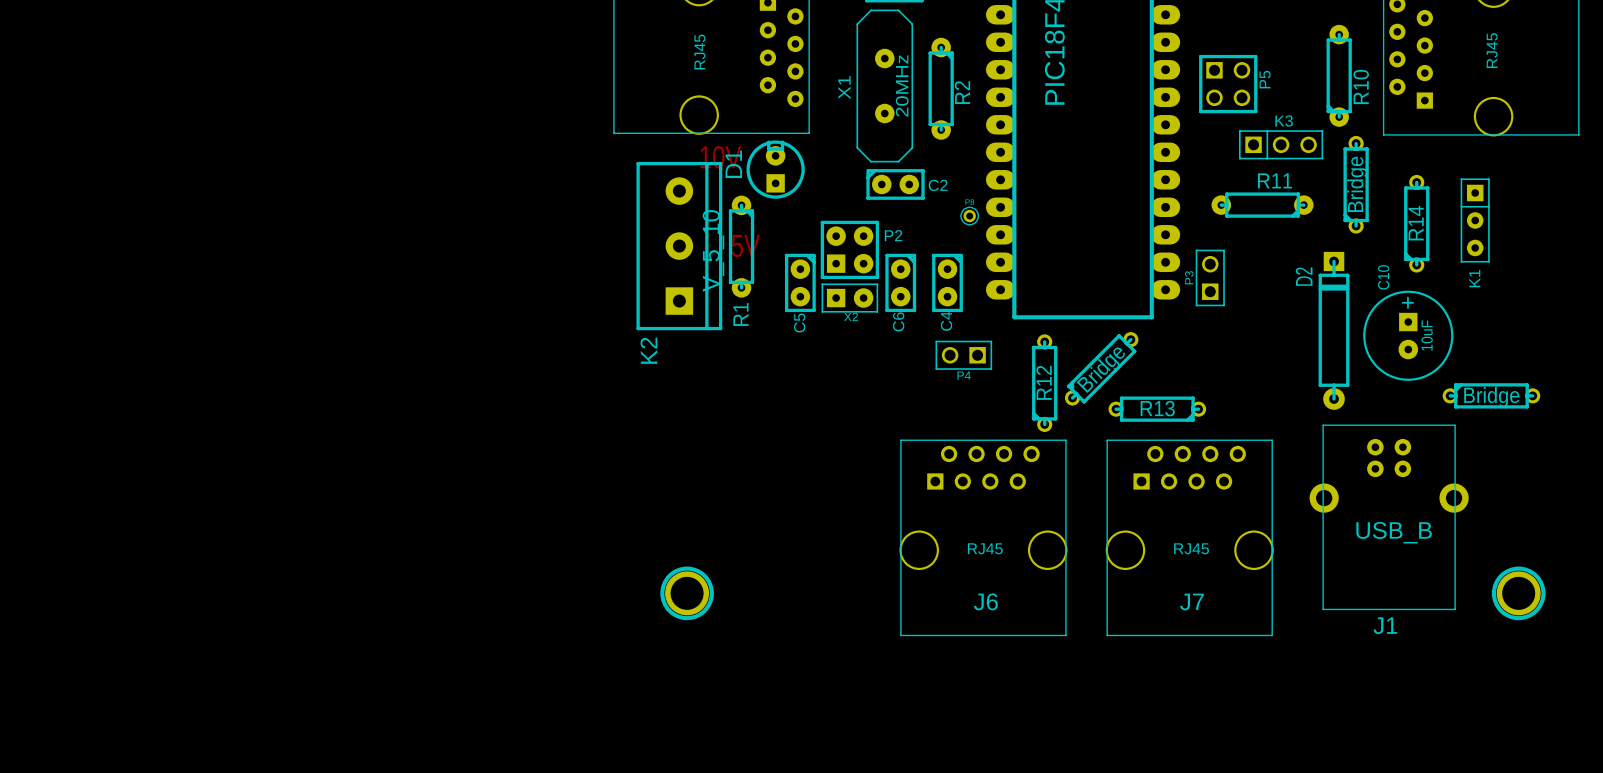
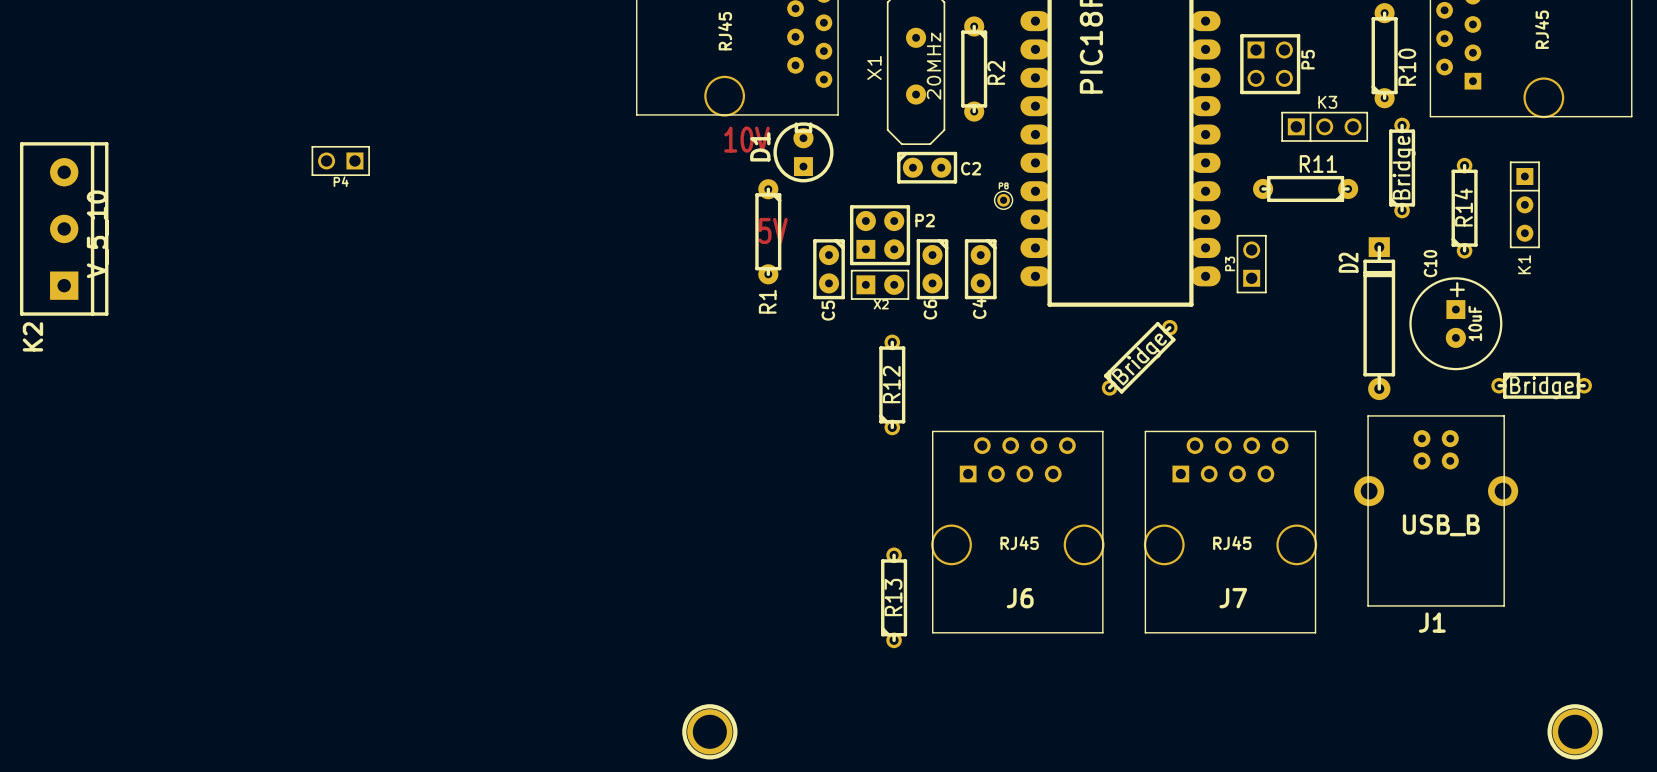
K2 position: (679, 246) -> (64, 228)
P4 position: (963, 355) -> (340, 160)
R12 position: (1044, 383) -> (892, 384)
R13 rotation: 0° (1157, 409) -> 90° clockwise (894, 597)
R13 position: (1157, 409) -> (894, 597)
part position: (687, 593) -> (709, 731)
part position: (1518, 593) -> (1575, 731)

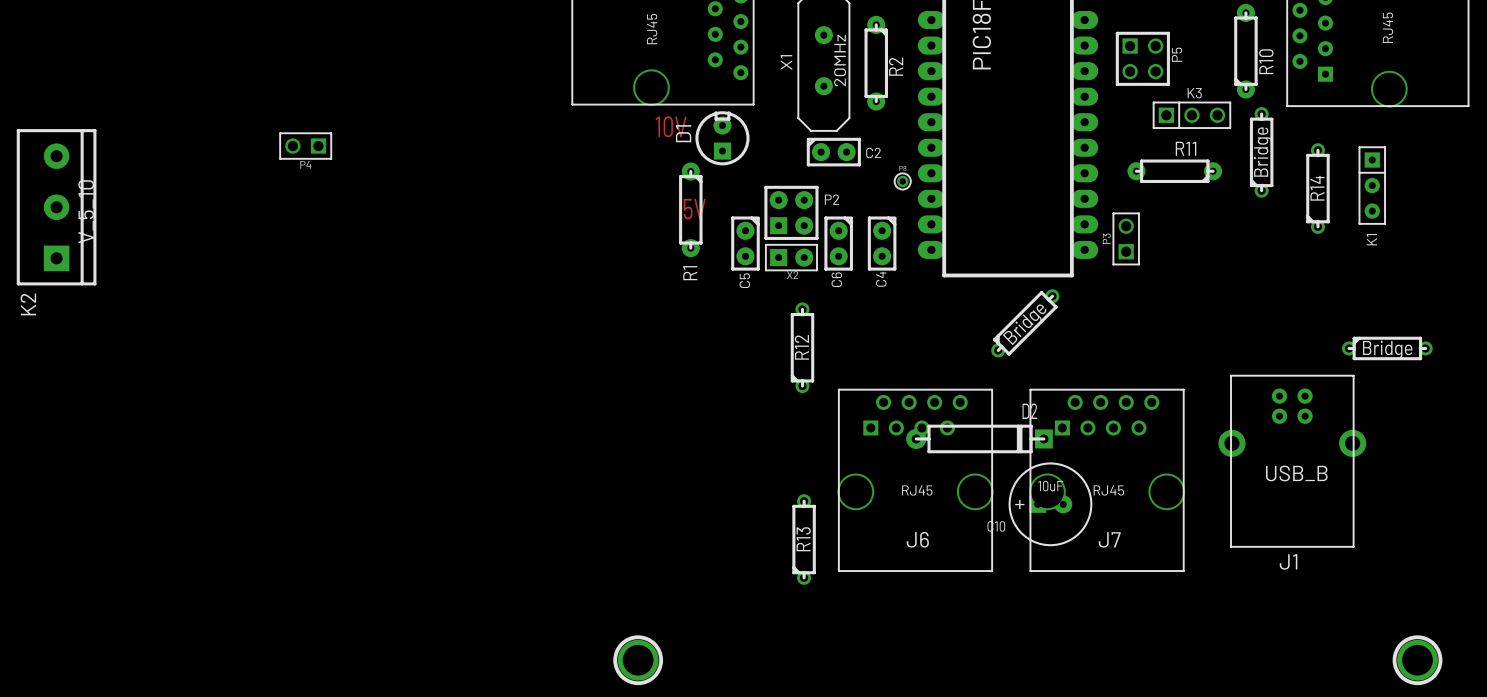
D2 rotation: 0° (1379, 318) -> 90° clockwise (979, 438)
D2 position: (1379, 318) -> (979, 438)
C10 rotation: 0° (1455, 323) -> 90° counterclockwise (1050, 504)
C10 position: (1455, 323) -> (1050, 504)

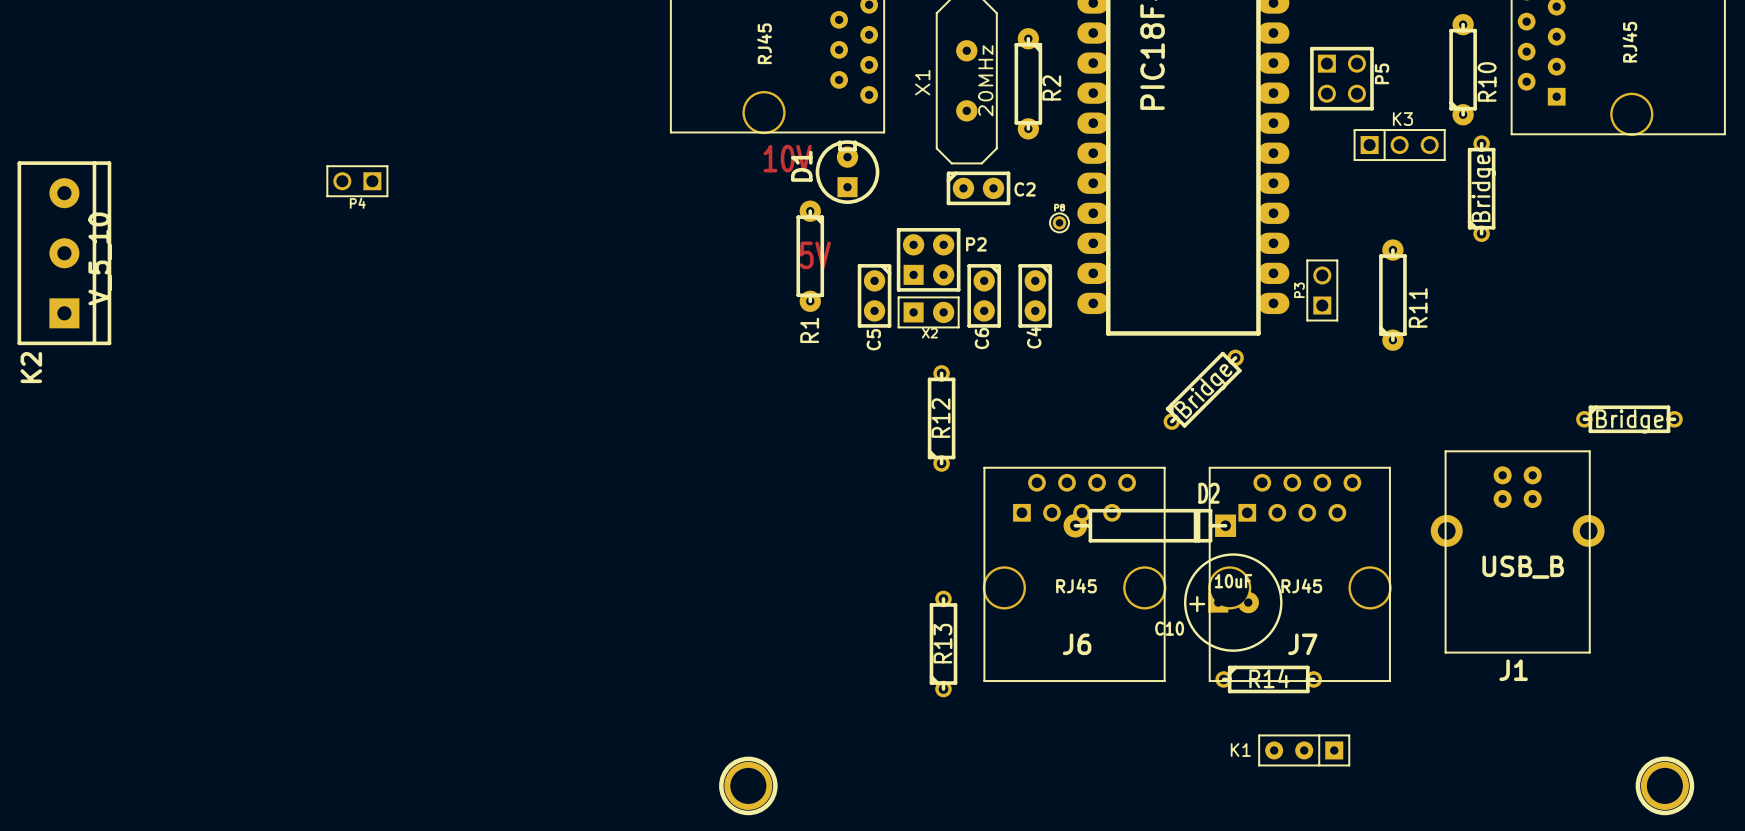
R11 rotation: 0° (1174, 171) -> 90° clockwise (1392, 295)
R11 position: (1174, 171) -> (1392, 295)
K1 rotation: 0° (1372, 185) -> 90° clockwise (1304, 750)
K1 position: (1372, 185) -> (1304, 750)
R14 rotation: 0° (1317, 188) -> 90° clockwise (1268, 679)
R14 position: (1317, 188) -> (1268, 679)

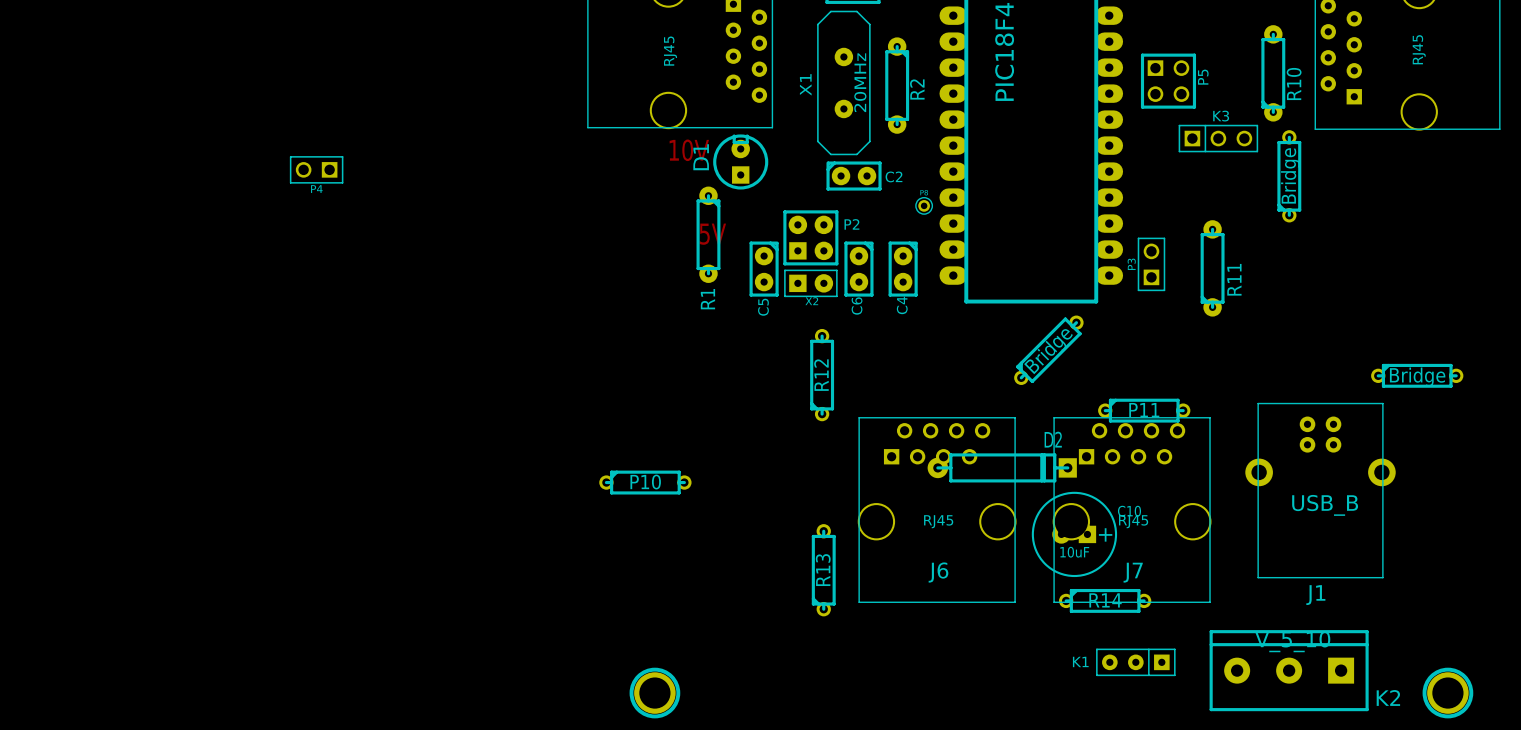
K2 rotation: 0° (64, 253) -> 90° counterclockwise (1289, 670)
K2 position: (64, 253) -> (1289, 670)
P11: none -> (1144, 410)
P10: none -> (645, 482)
C10 rotation: 0° (1233, 602) -> 180° (1074, 534)

